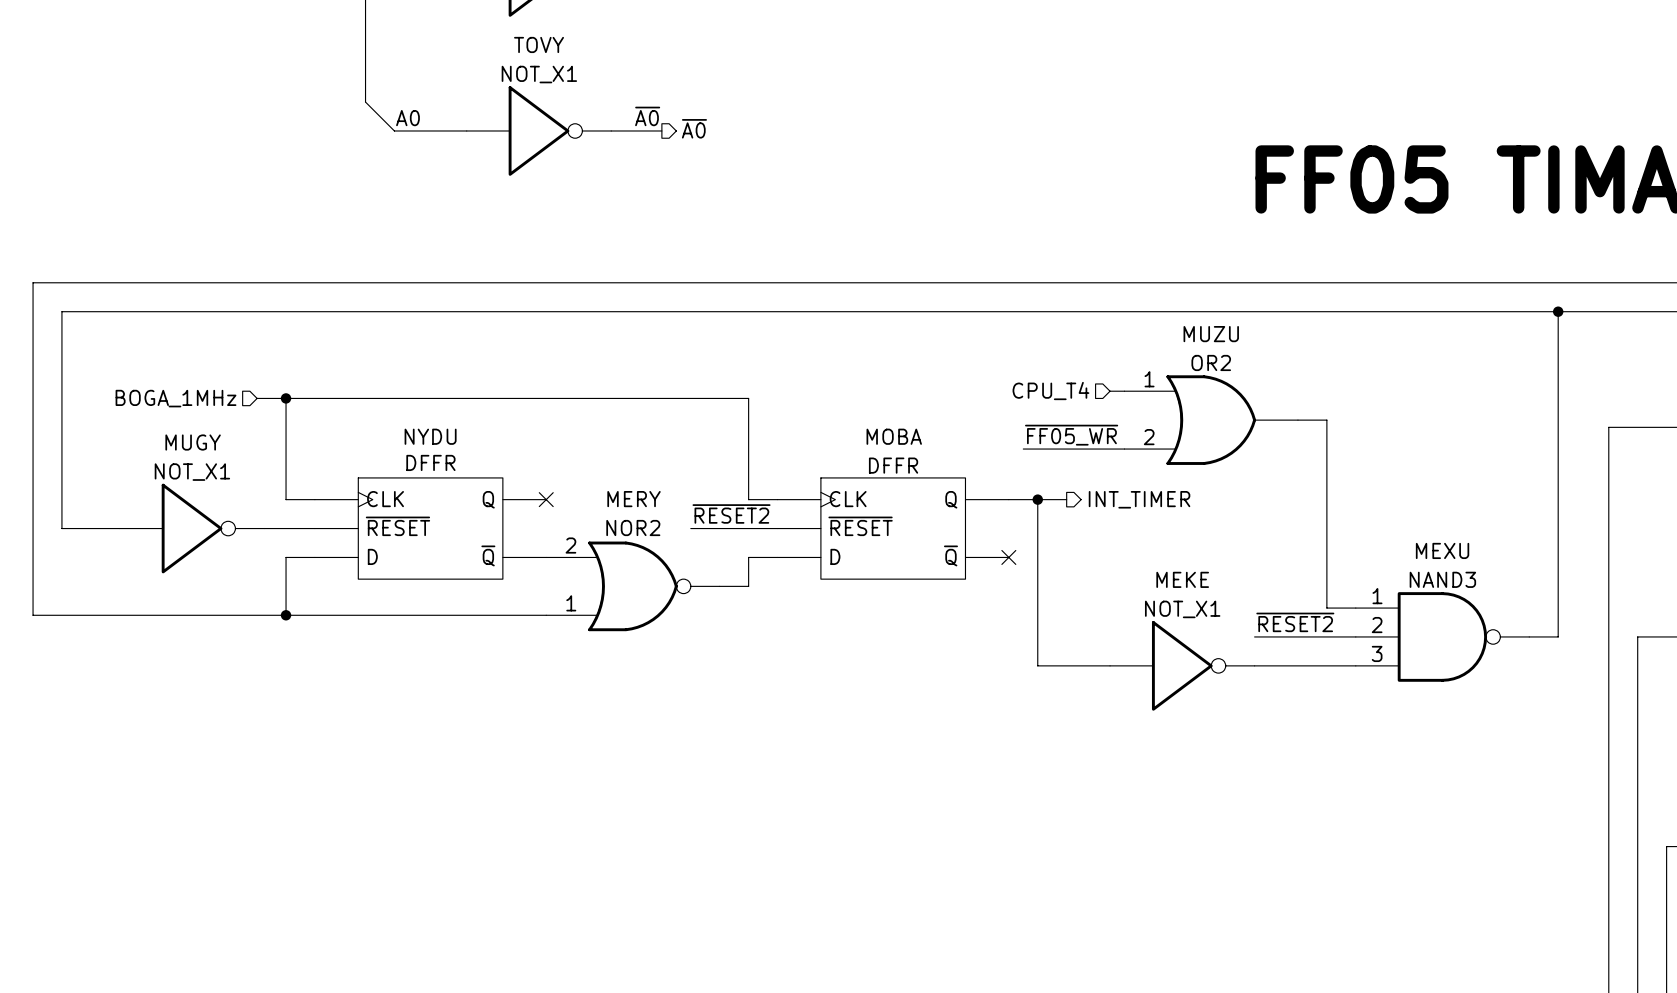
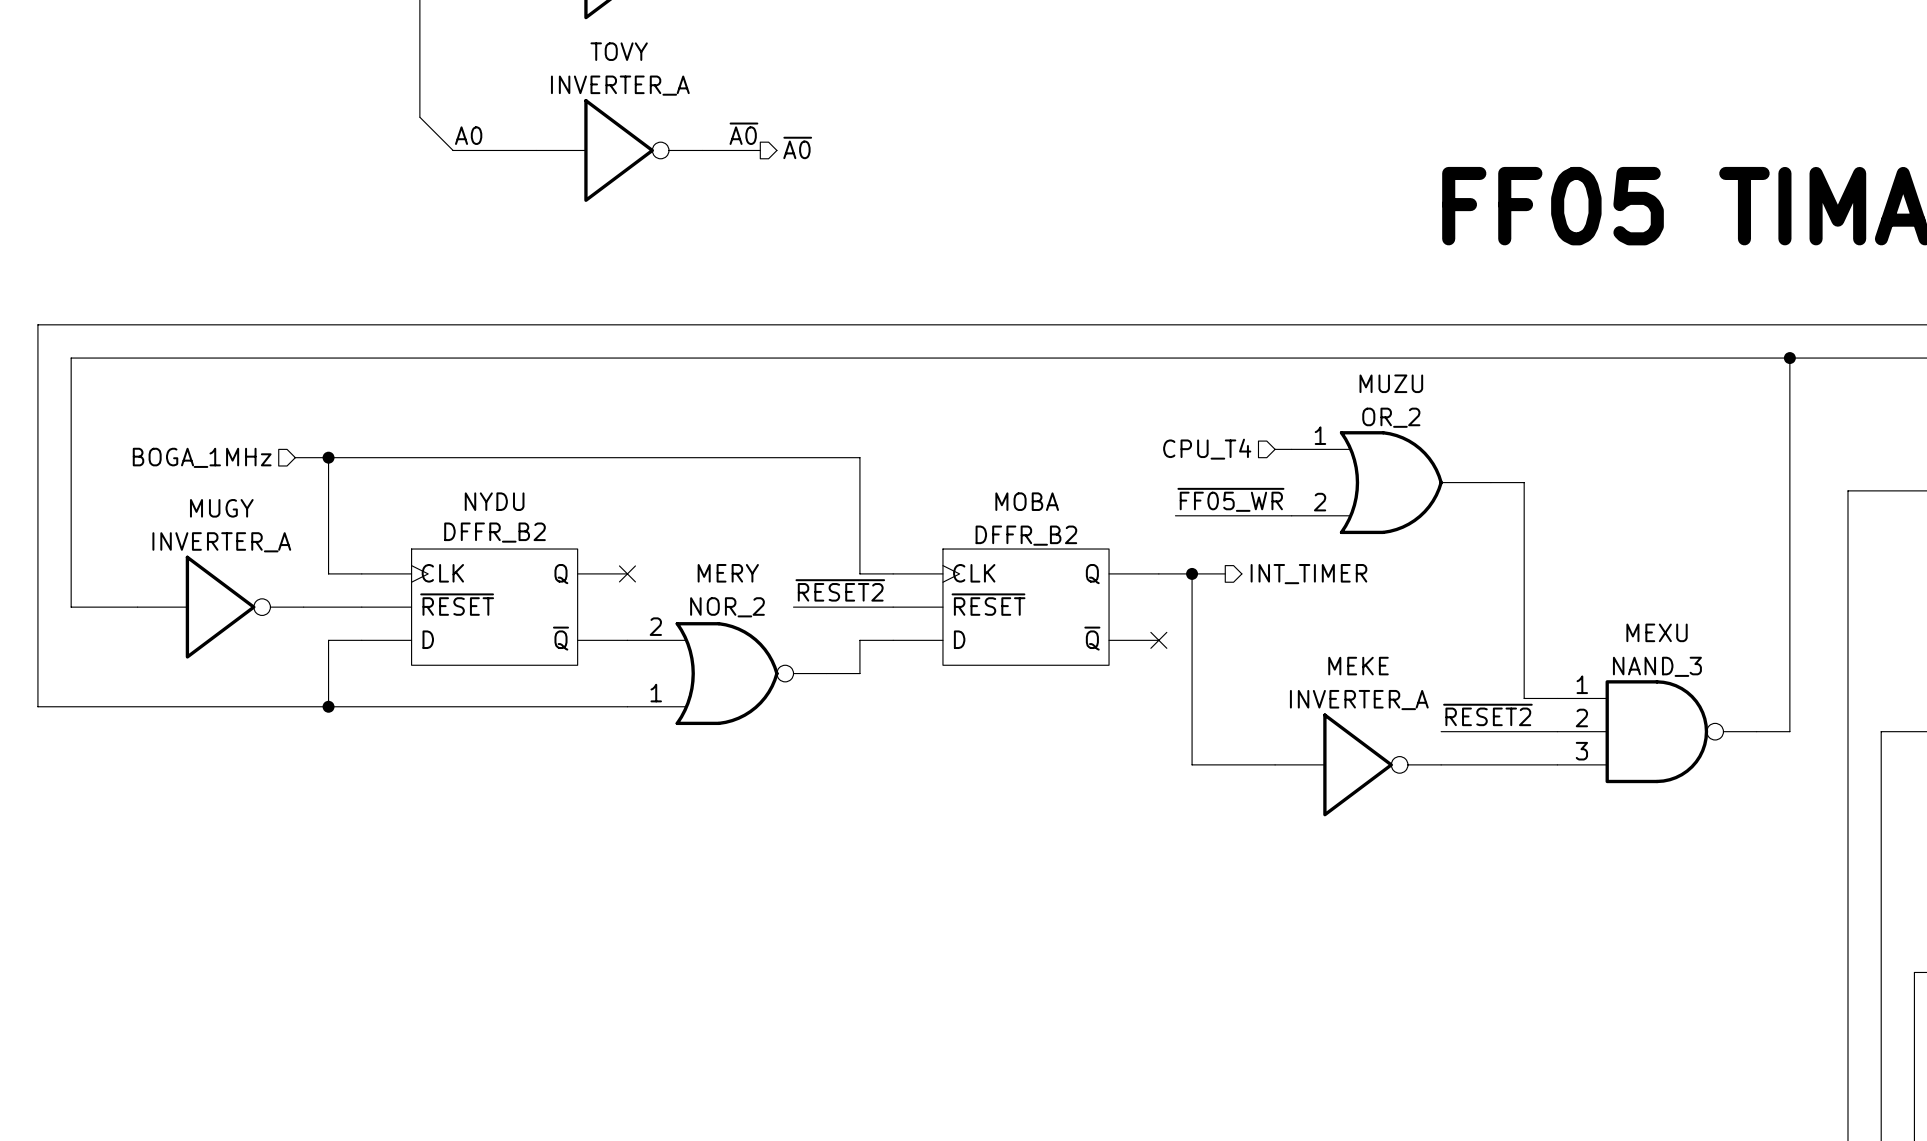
TOVY value: NOT_X1 (539, 74) -> INVERTER_A (620, 85)
MUZU value: OR2 (1211, 362) -> OR_2 (1391, 417)
NYDU value: DFFR (430, 462) -> DFFR_B2 (495, 532)
MOBA value: DFFR (893, 465) -> DFFR_B2 (1026, 535)
MUGY value: NOT_X1 (192, 472) -> INVERTER_A (221, 542)
MERY value: NOR2 (633, 528) -> NOR_2 (727, 607)
MEXU value: NAND3 (1442, 579) -> NAND_3 (1657, 666)
MEKE value: NOT_X1 (1182, 609) -> INVERTER_A (1359, 700)

